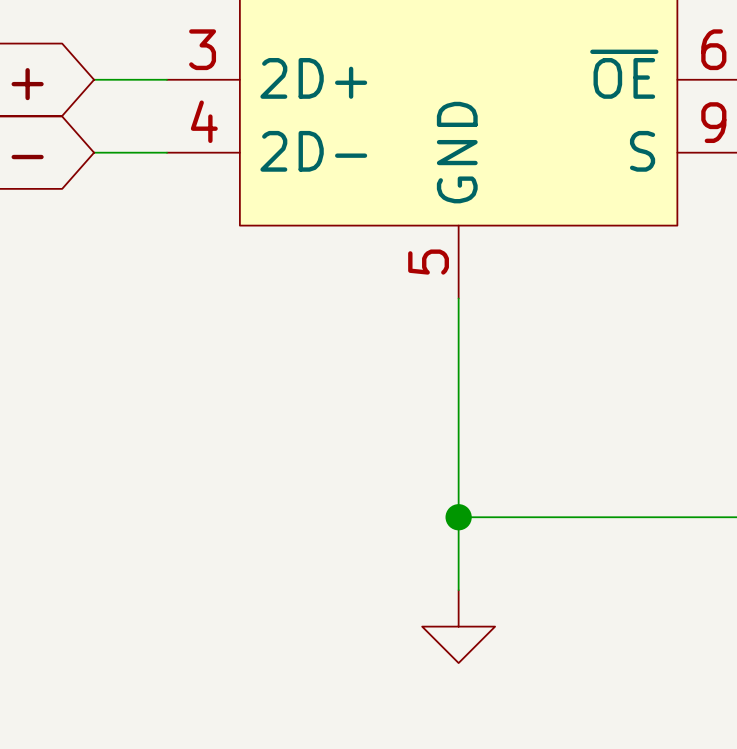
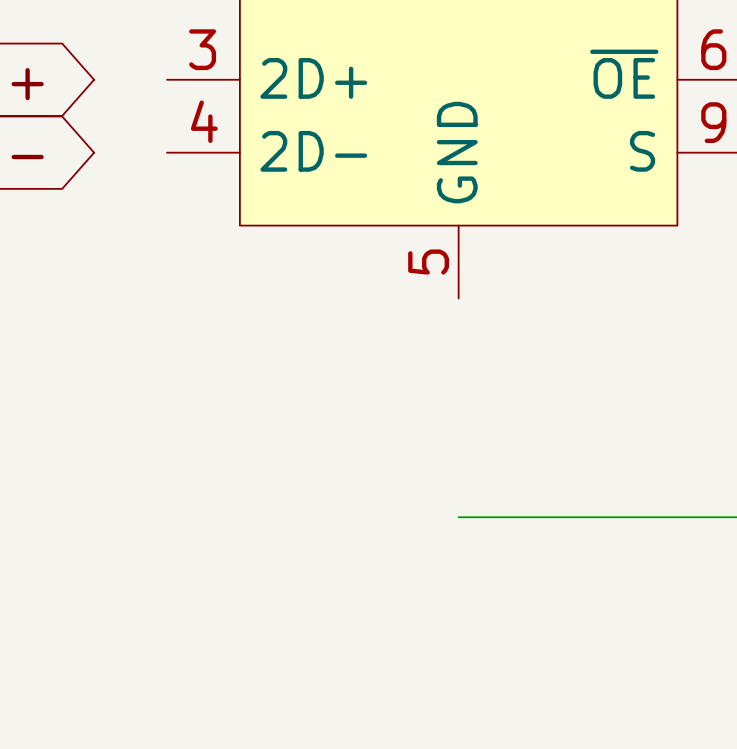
wire: (94, 79) (166, 79) -> none
wire: (94, 152) (166, 152) -> none
wire: (458, 298) (458, 590) -> none
junction: (458, 517) -> none
power symbol: (458, 626) -> none

